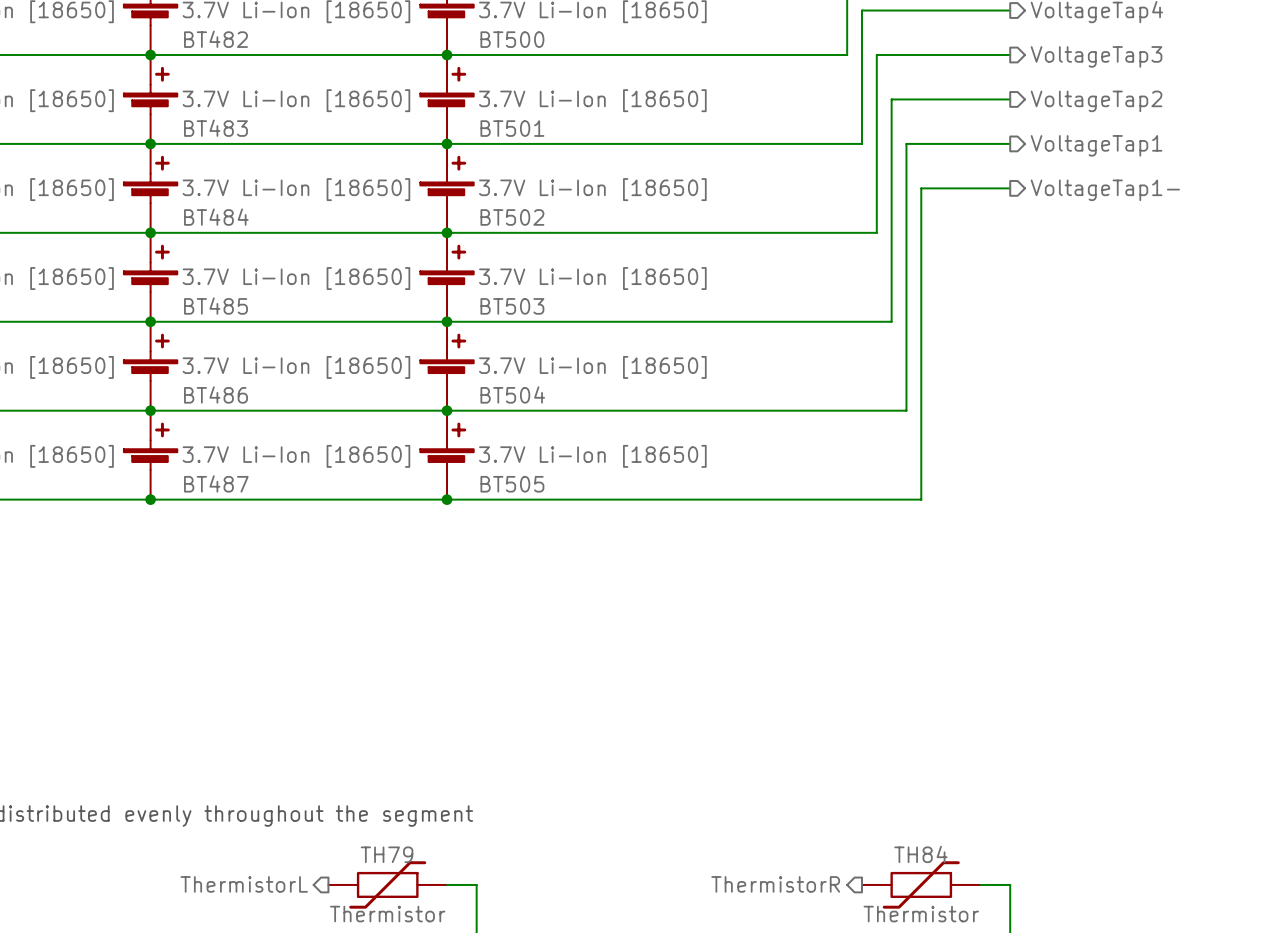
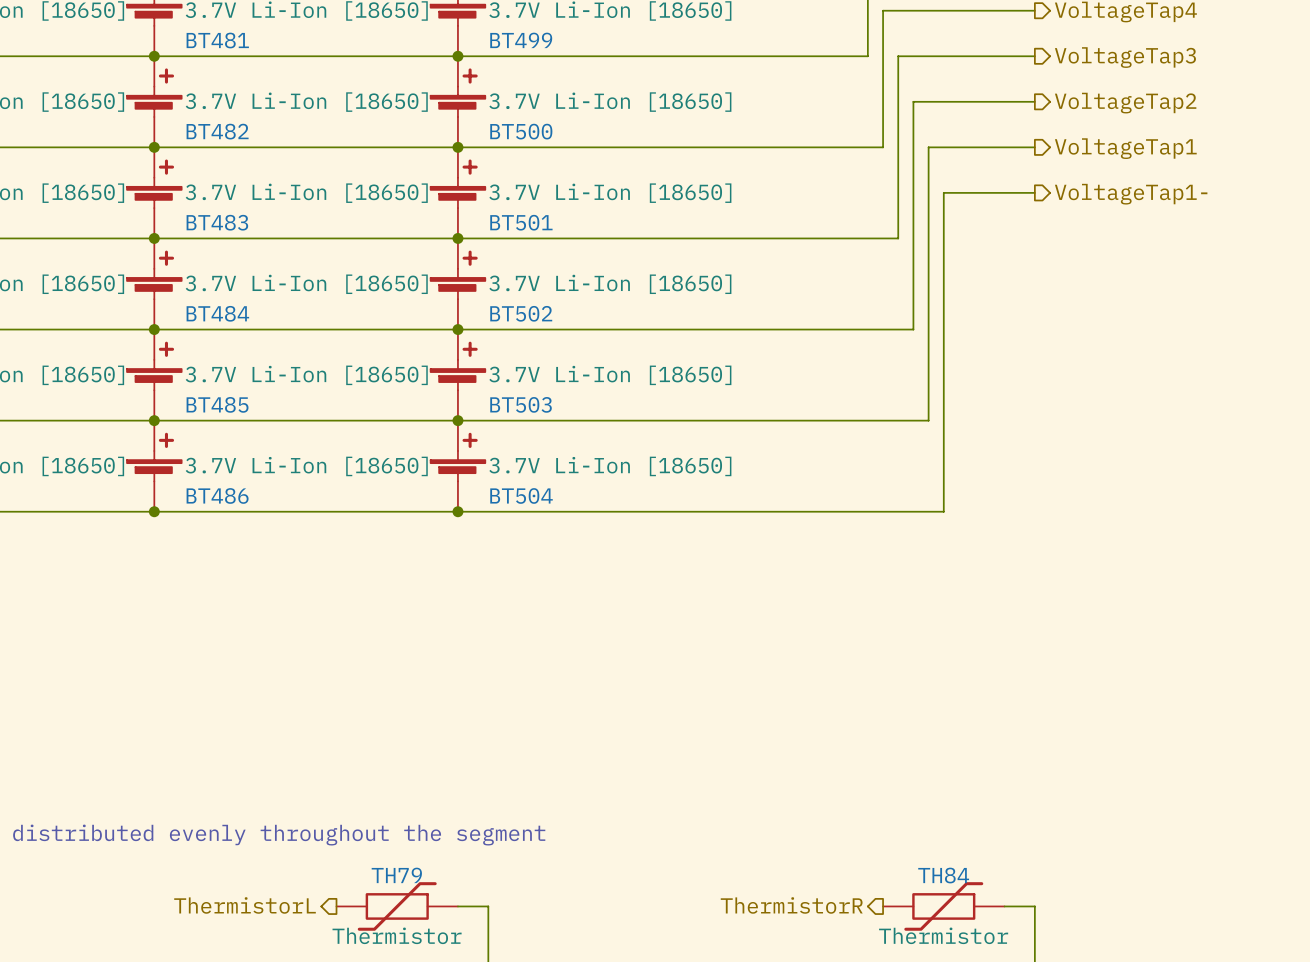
BT482 name: BT482 (215, 39) -> BT481 (217, 40)
BT500 name: BT500 (512, 39) -> BT499 (521, 40)
BT483 name: BT483 (215, 128) -> BT482 (217, 131)
BT501 name: BT501 (512, 128) -> BT500 (521, 131)
BT484 name: BT484 (216, 217) -> BT483 (217, 222)
BT502 name: BT502 (512, 217) -> BT501 (521, 222)
BT485 name: BT485 (215, 306) -> BT484 (217, 313)
BT503 name: BT503 (512, 306) -> BT502 (521, 313)
BT486 name: BT486 (215, 394) -> BT485 (217, 404)
BT504 name: BT504 (512, 394) -> BT503 (521, 404)
BT487 name: BT487 (216, 483) -> BT486 (217, 495)
BT505 name: BT505 (512, 484) -> BT504 (521, 495)

